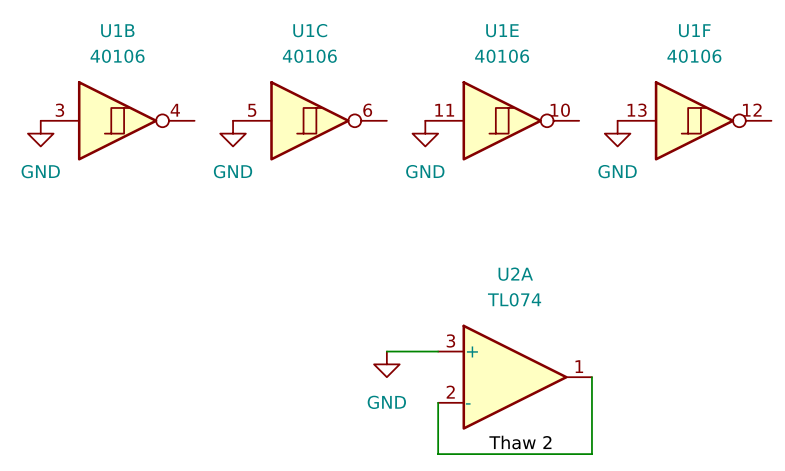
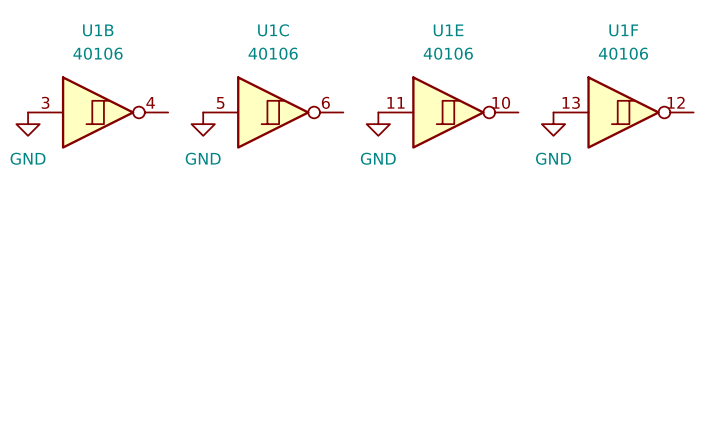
wire: (386, 351) (438, 351) -> none
power symbol: GND (386, 364) -> none
U2A: TL074 (515, 377) -> none
wire: (591, 377) (591, 454) (438, 454) (438, 402) -> none
label: Thaw 2 (520, 442) -> none

